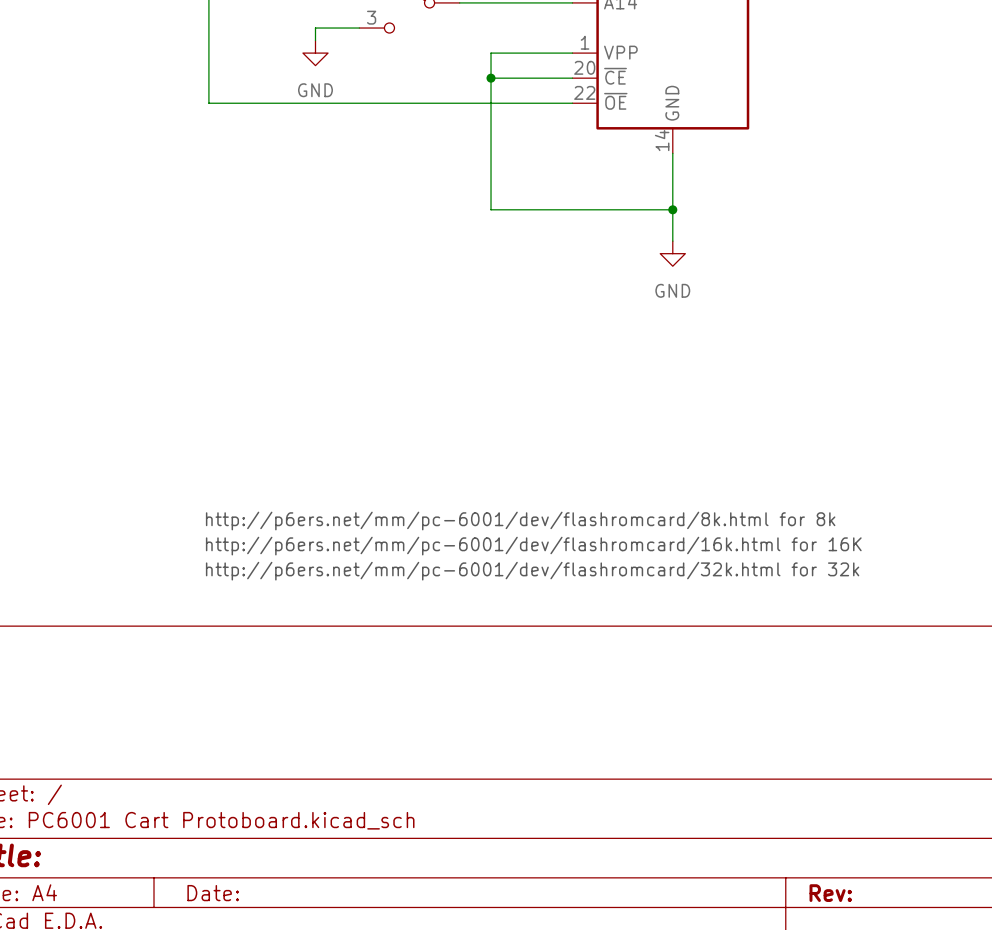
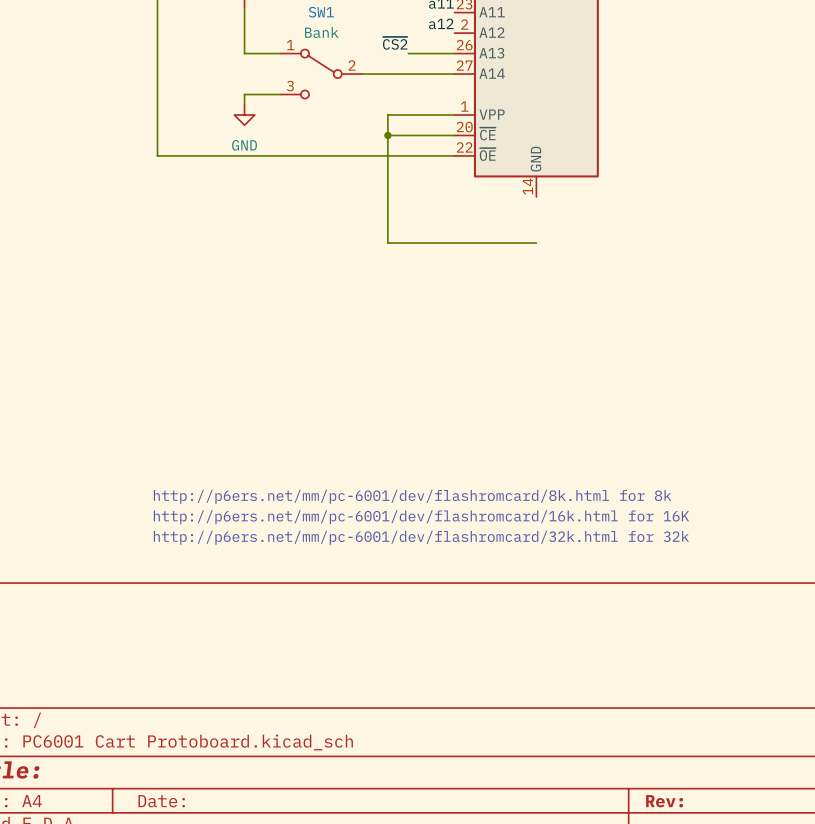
wire: (672, 153) (672, 241) -> none
junction: (672, 209) -> none
power symbol: GND (672, 253) -> none

